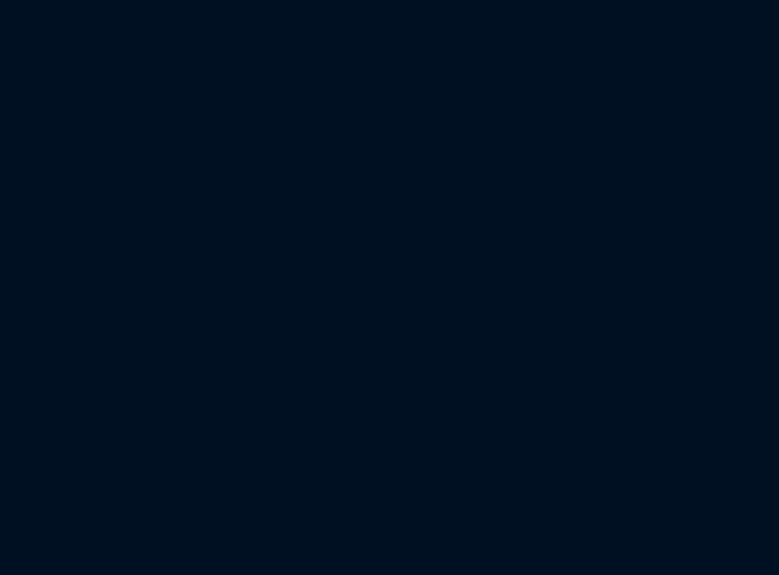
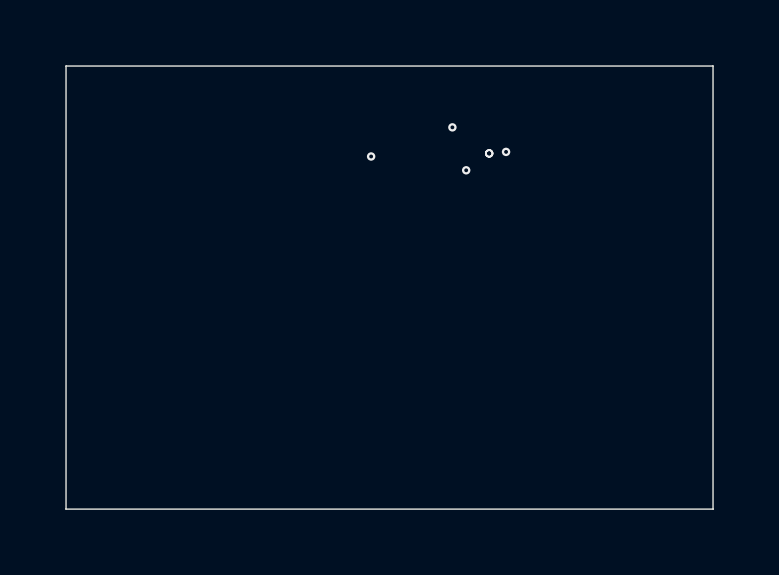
board edge: none -> (66, 66) (713, 66) (713, 509) (66, 509) (66, 66)
via: none -> (452, 127)
via: none -> (506, 151)
via: none -> (489, 153)
via: none -> (371, 156)
via: none -> (466, 170)

